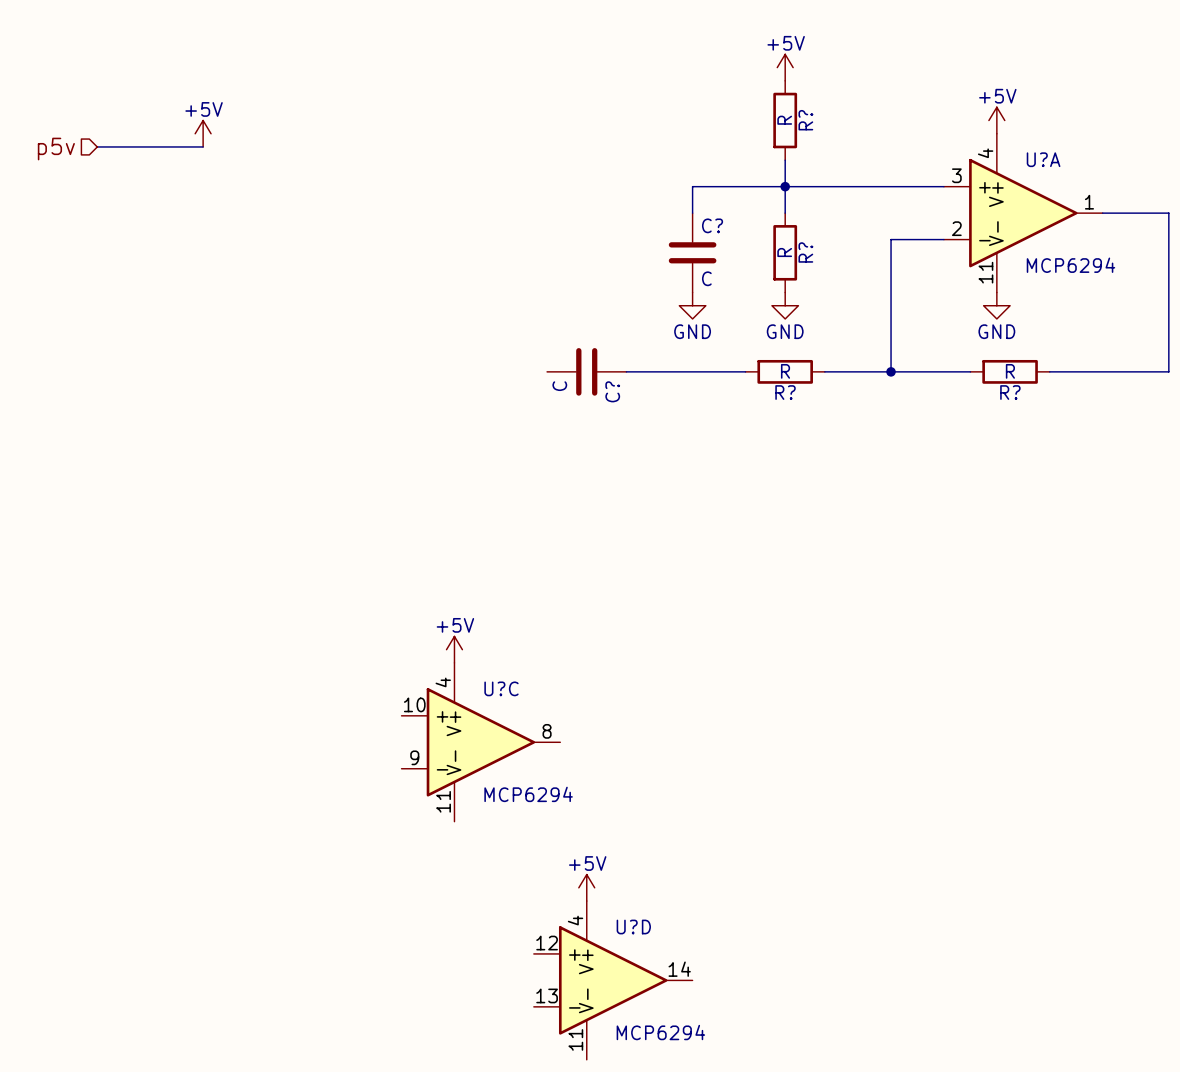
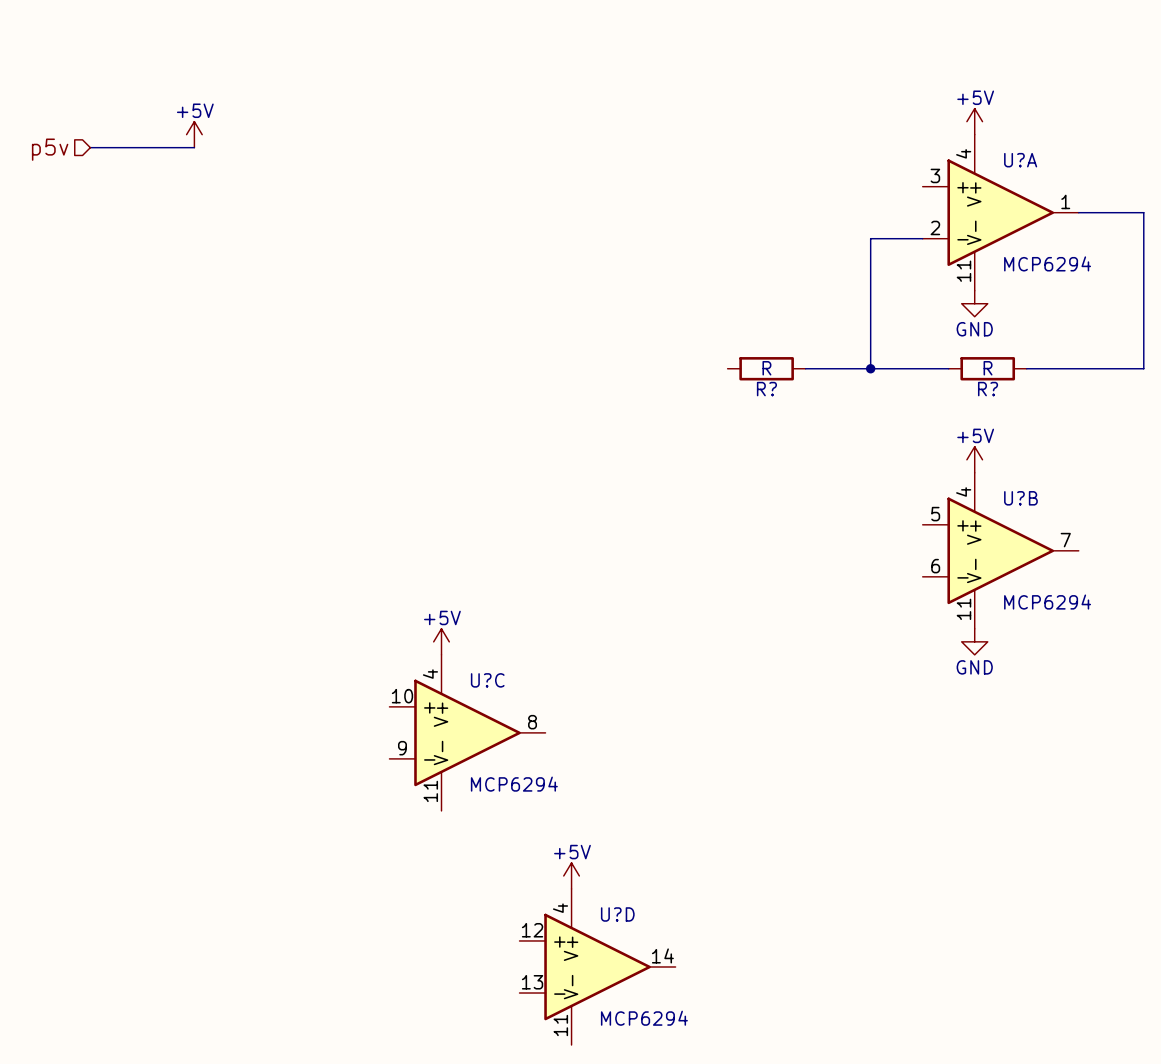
power symbol: +5V (785, 67) -> none
R?: R (785, 120) -> none
wire: (785, 160) (785, 213) -> none
junction: (785, 186) -> none
wire: (943, 186) (692, 186) (692, 213) -> none
C?: C (692, 252) -> none
R?: R (785, 252) -> none
power symbol: GND (692, 305) -> none
power symbol: GND (785, 305) -> none
C?: C (586, 371) -> none
wire: (626, 371) (745, 371) -> none
power symbol: none -> +5V (974, 459)
U?B: none -> MCP6294 (1000, 550)
power symbol: none -> GND (974, 641)

